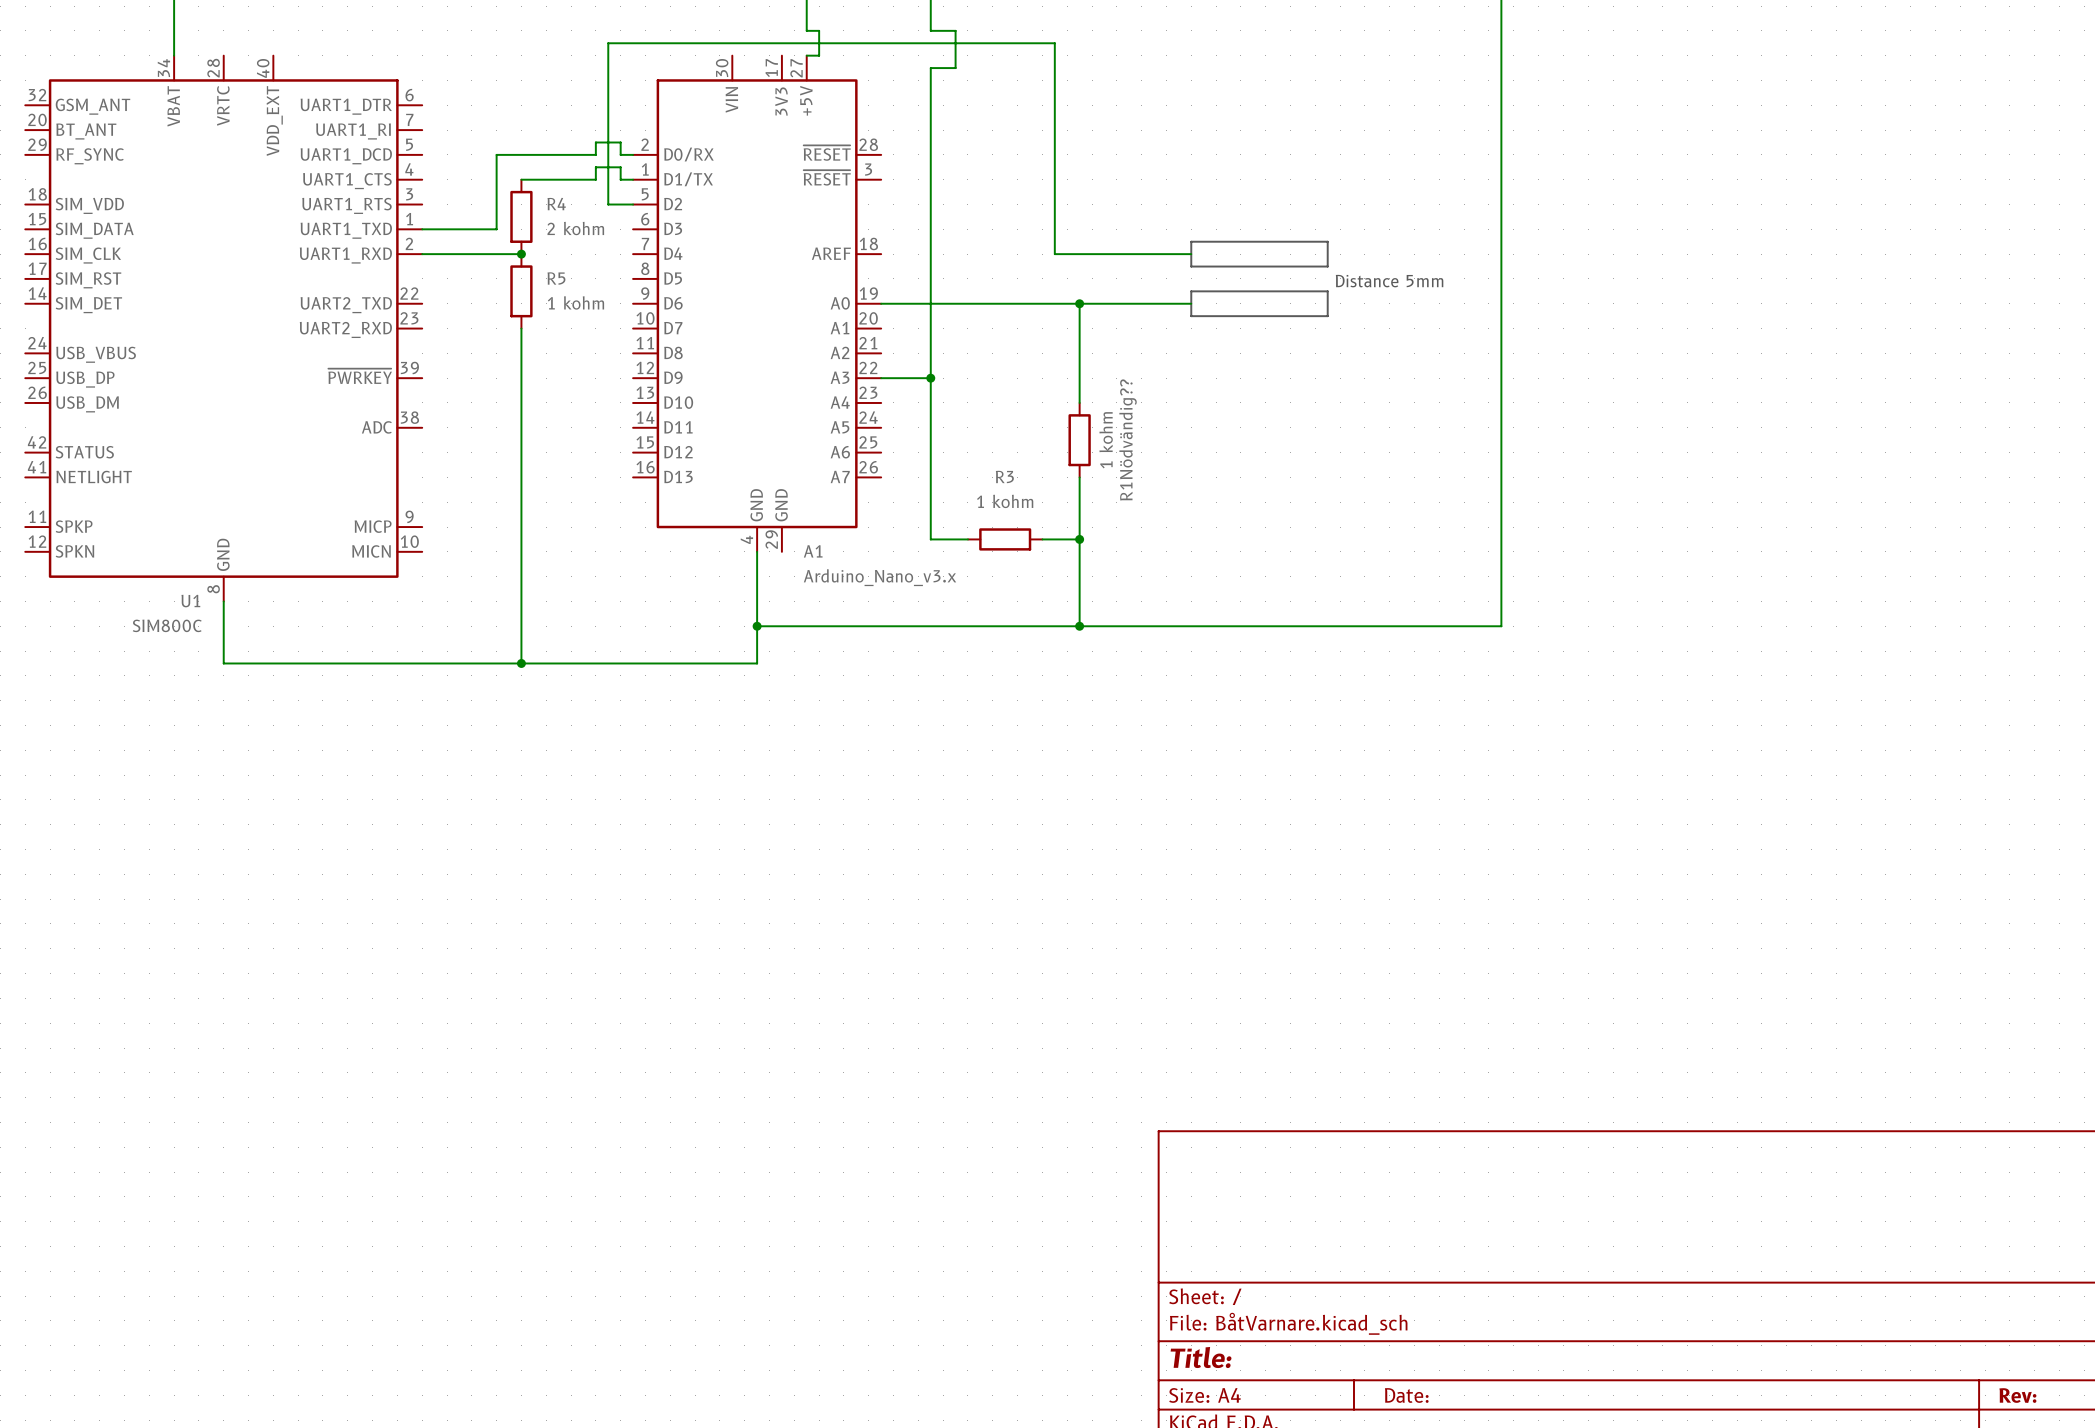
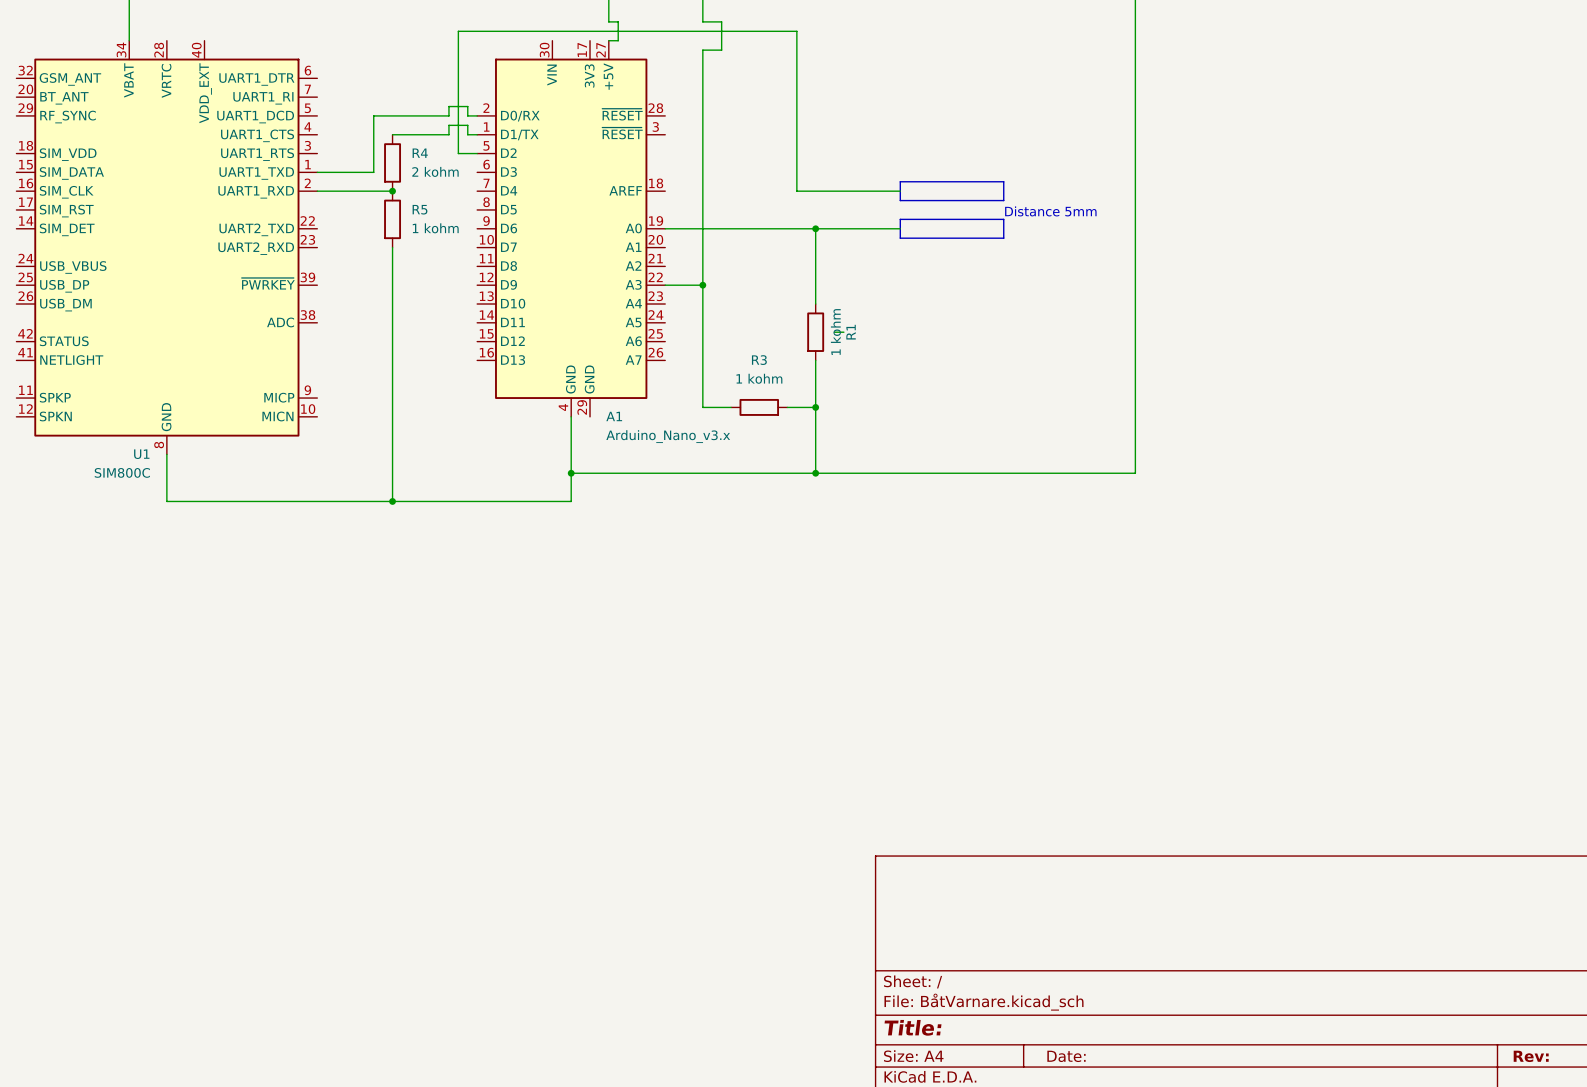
R1Nödvändig?? name: R1Nödvändig?? (1128, 439) -> R1 (851, 332)
wire: none -> (834, 332) (843, 332)

